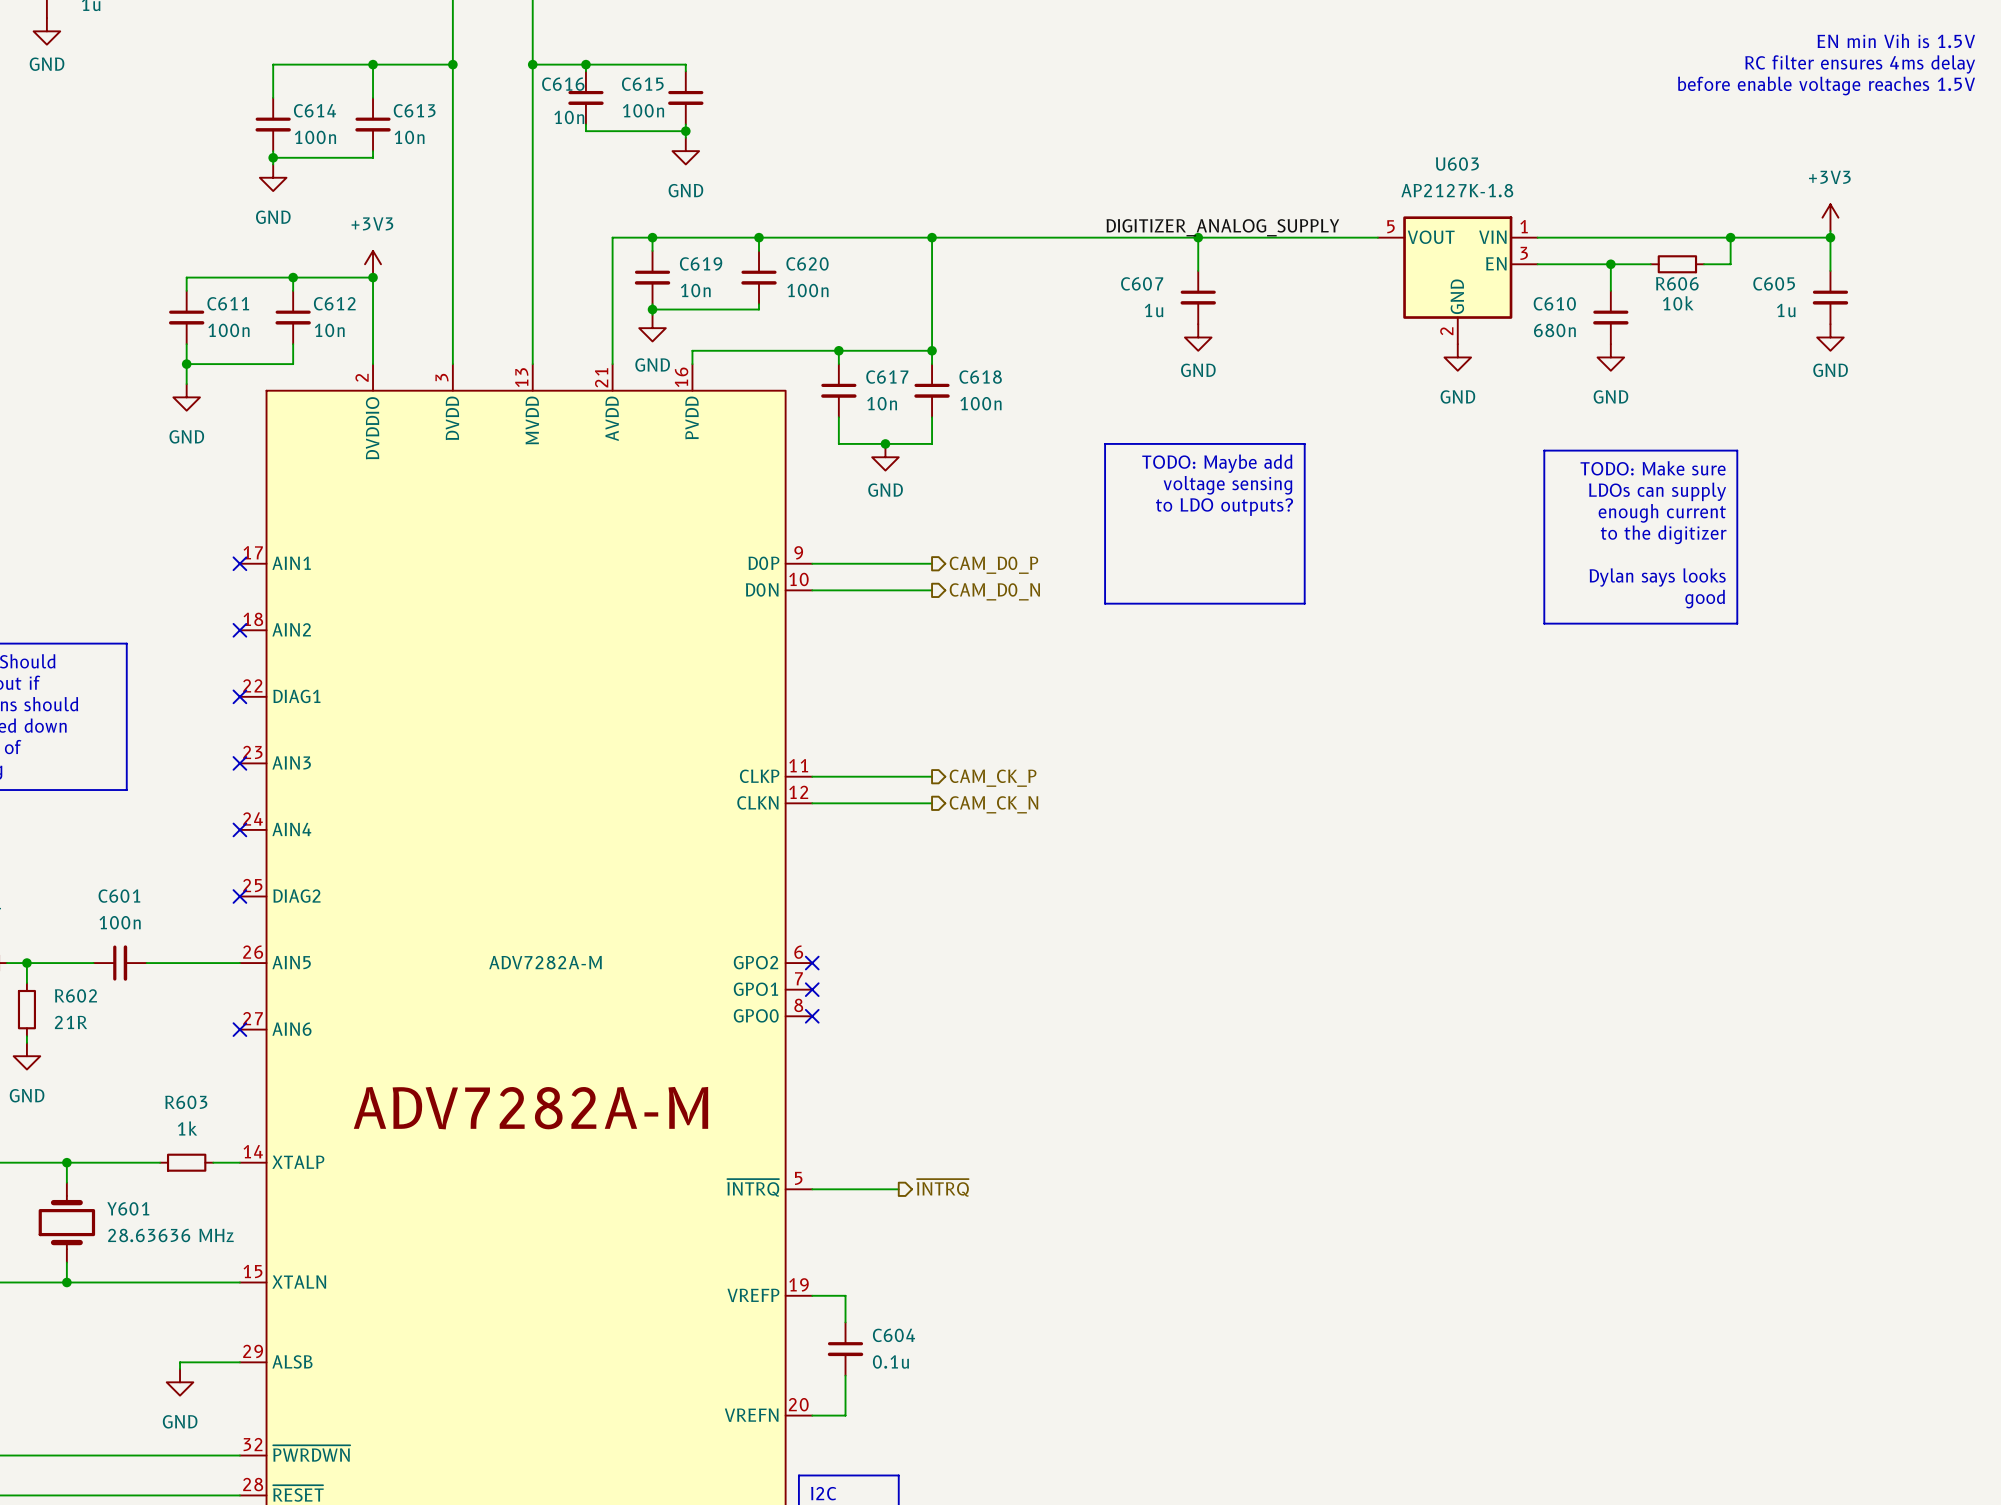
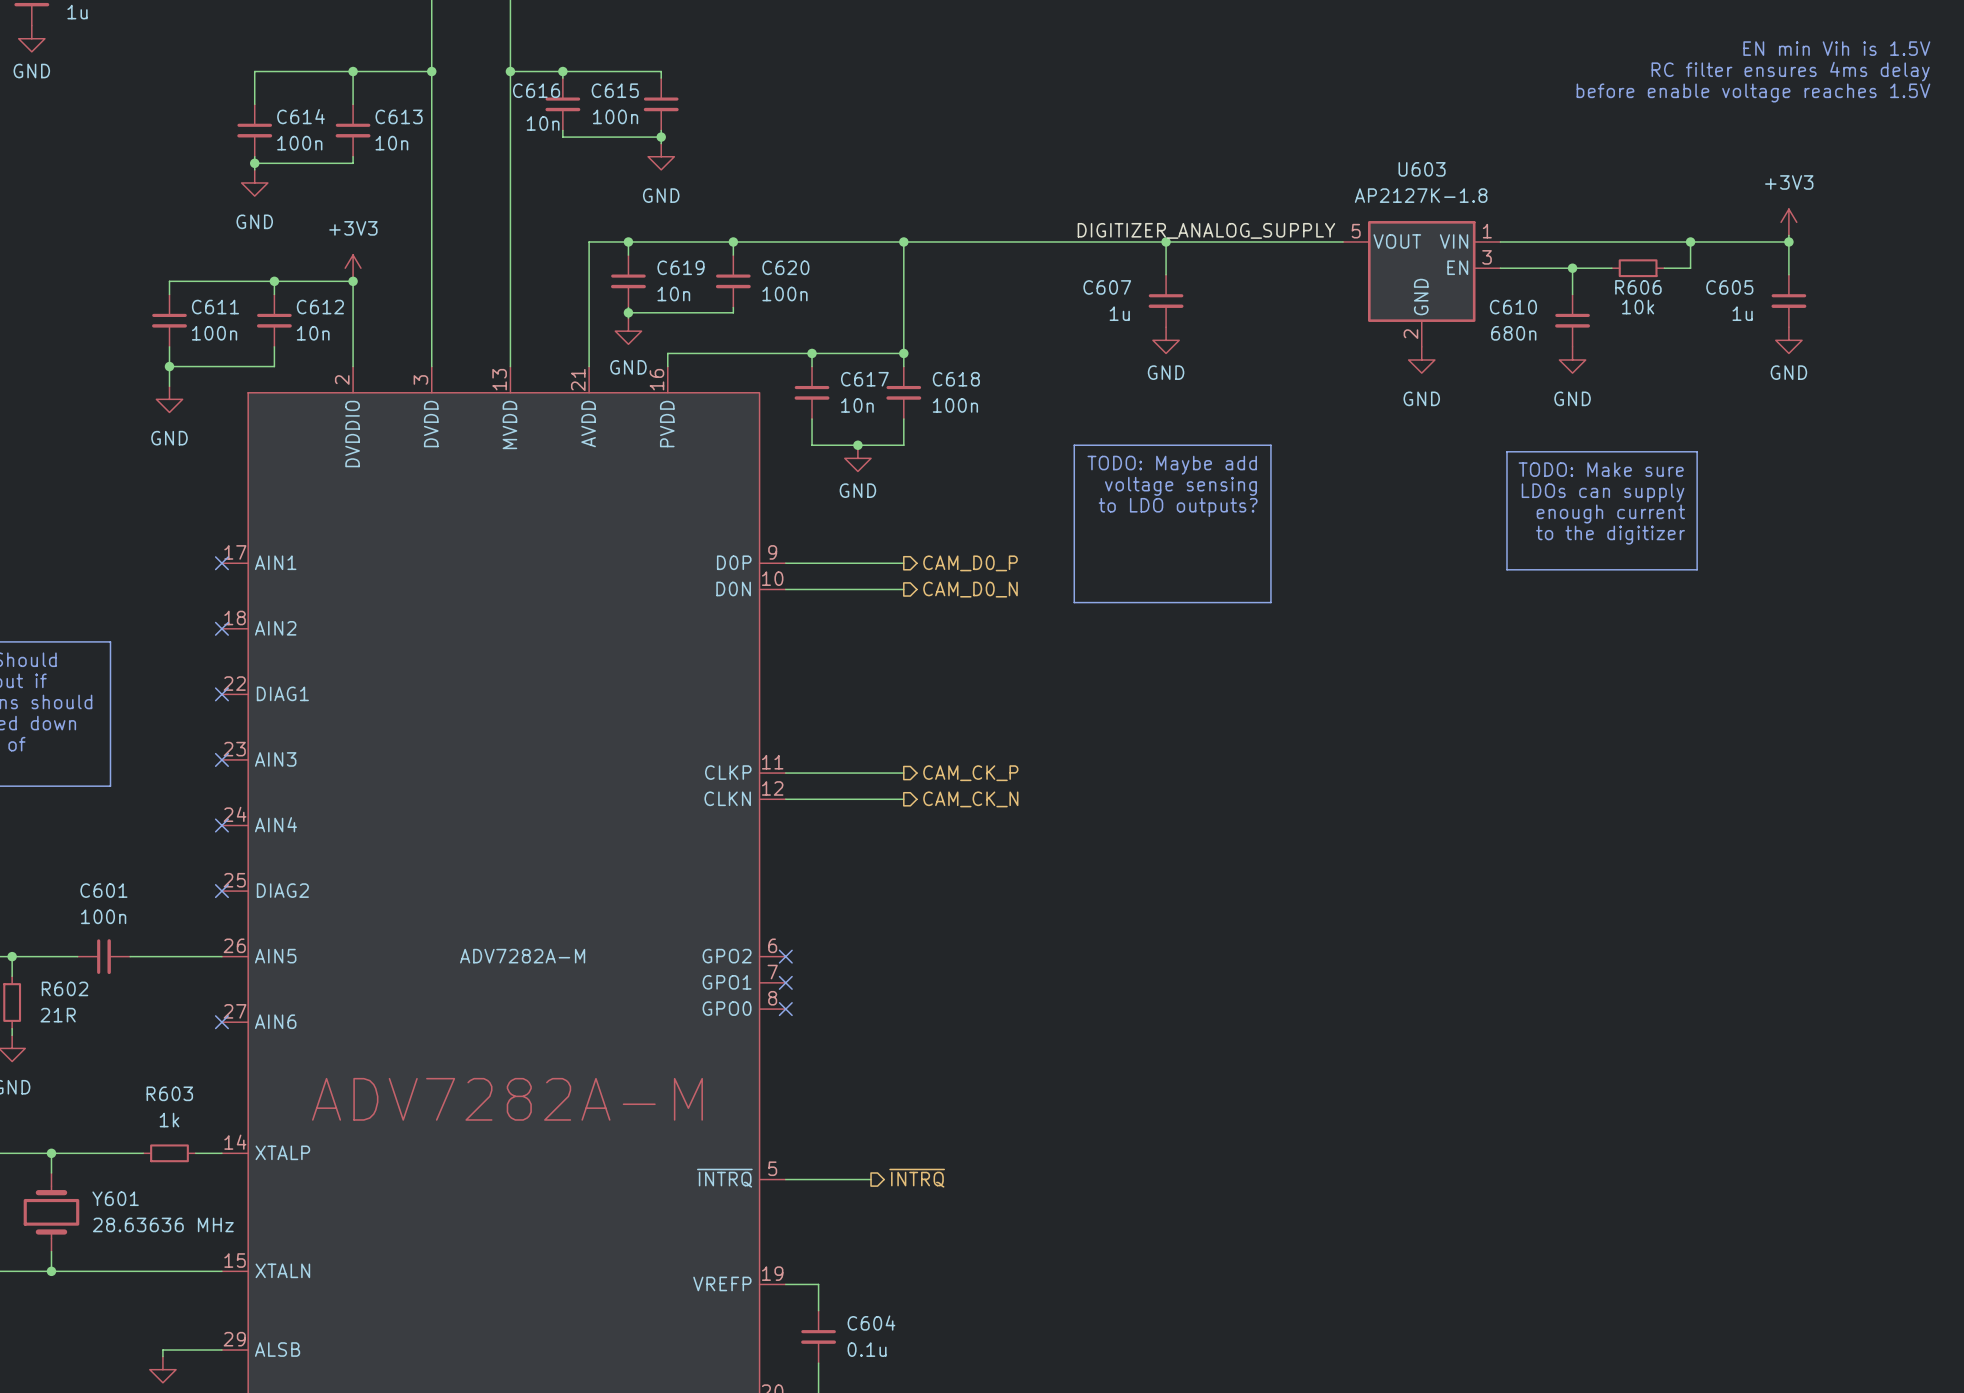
line: (1544, 570) (1544, 623) (1737, 623) (1737, 570) -> (1506, 569) (1697, 569)
text: Dylan says looks (1657, 577) -> none
text: good (1705, 599) -> none

